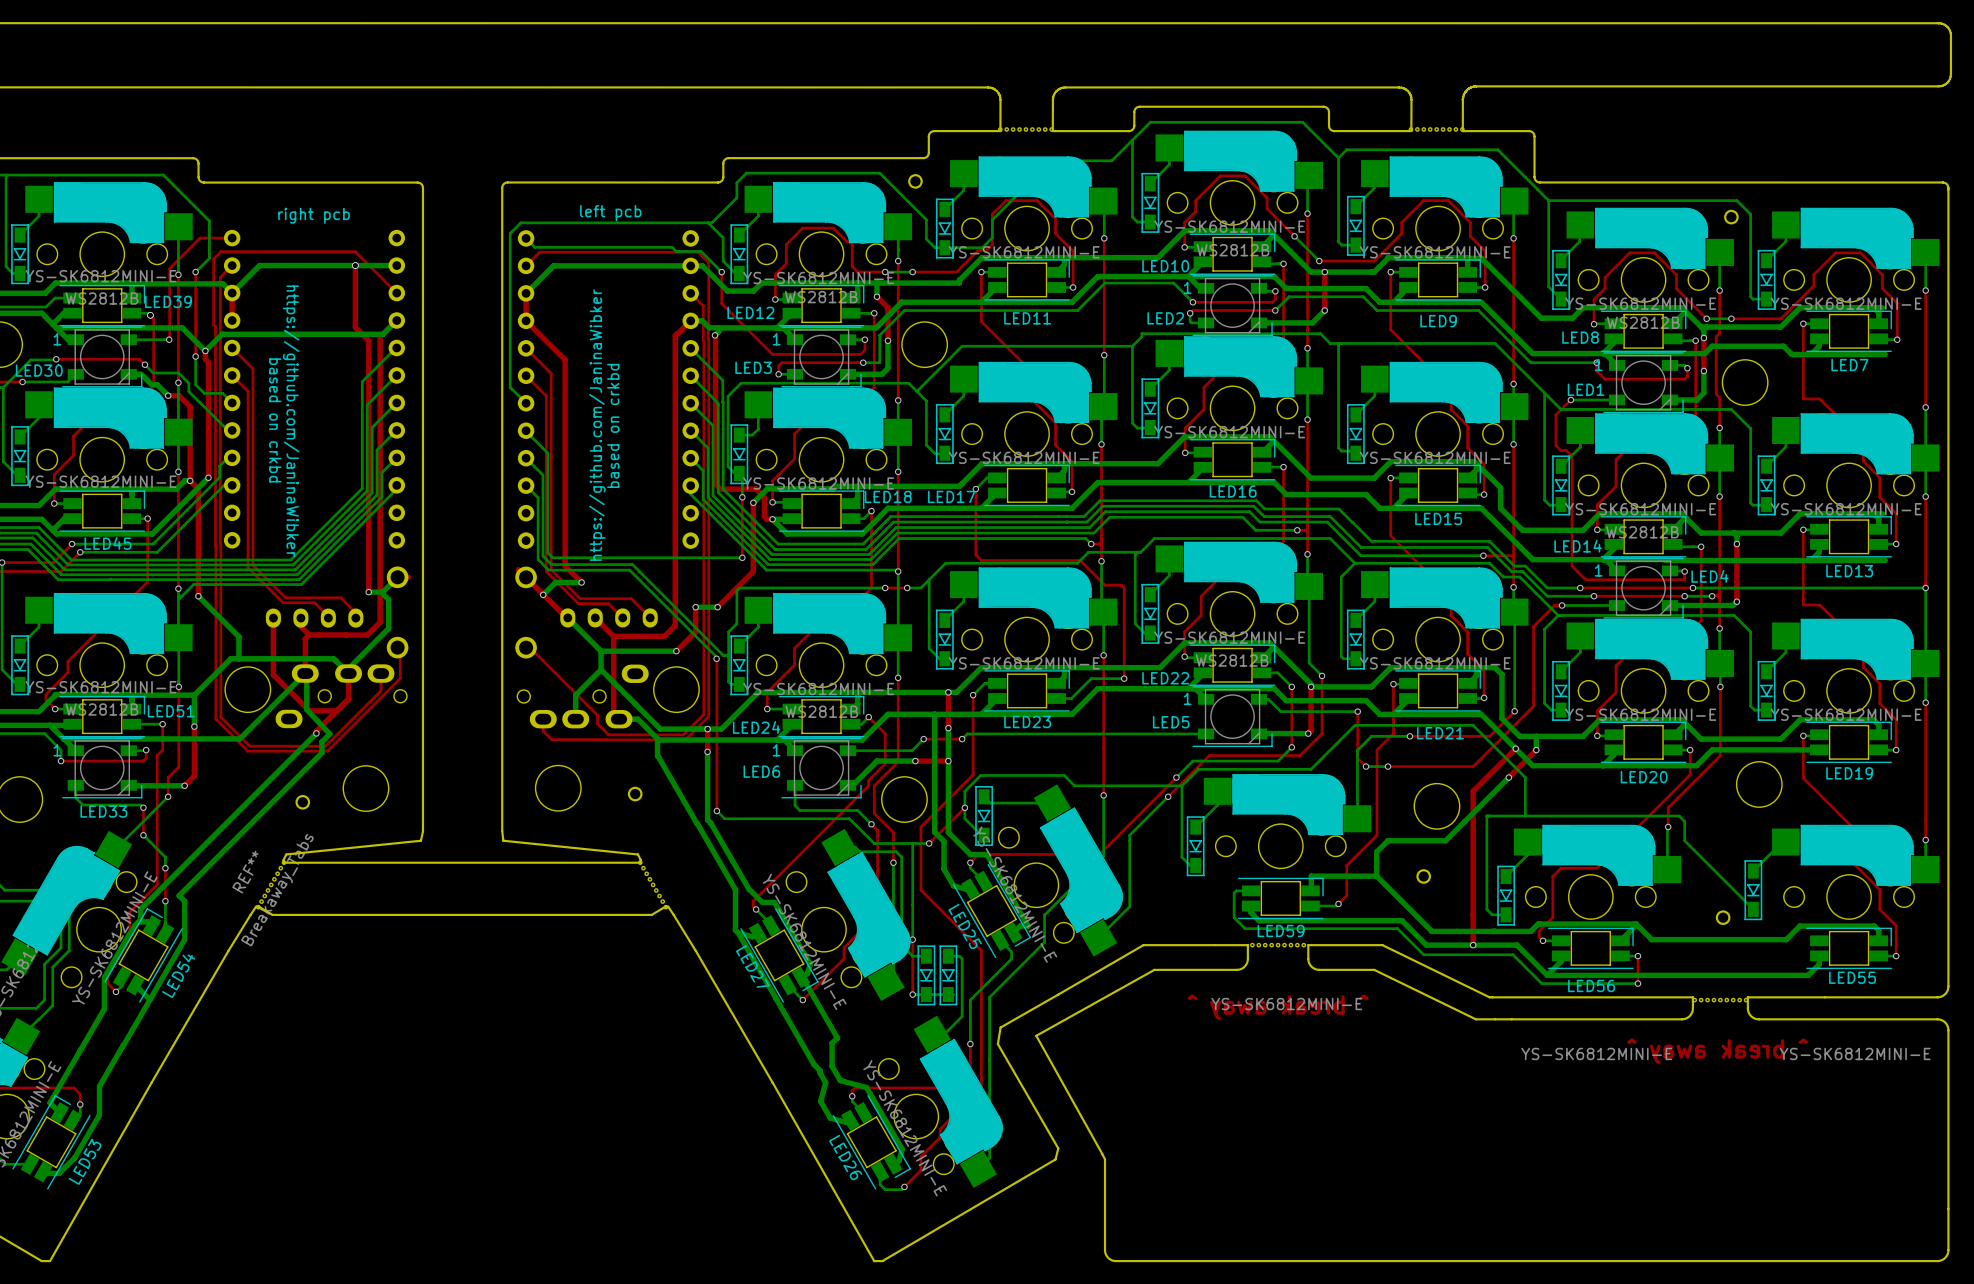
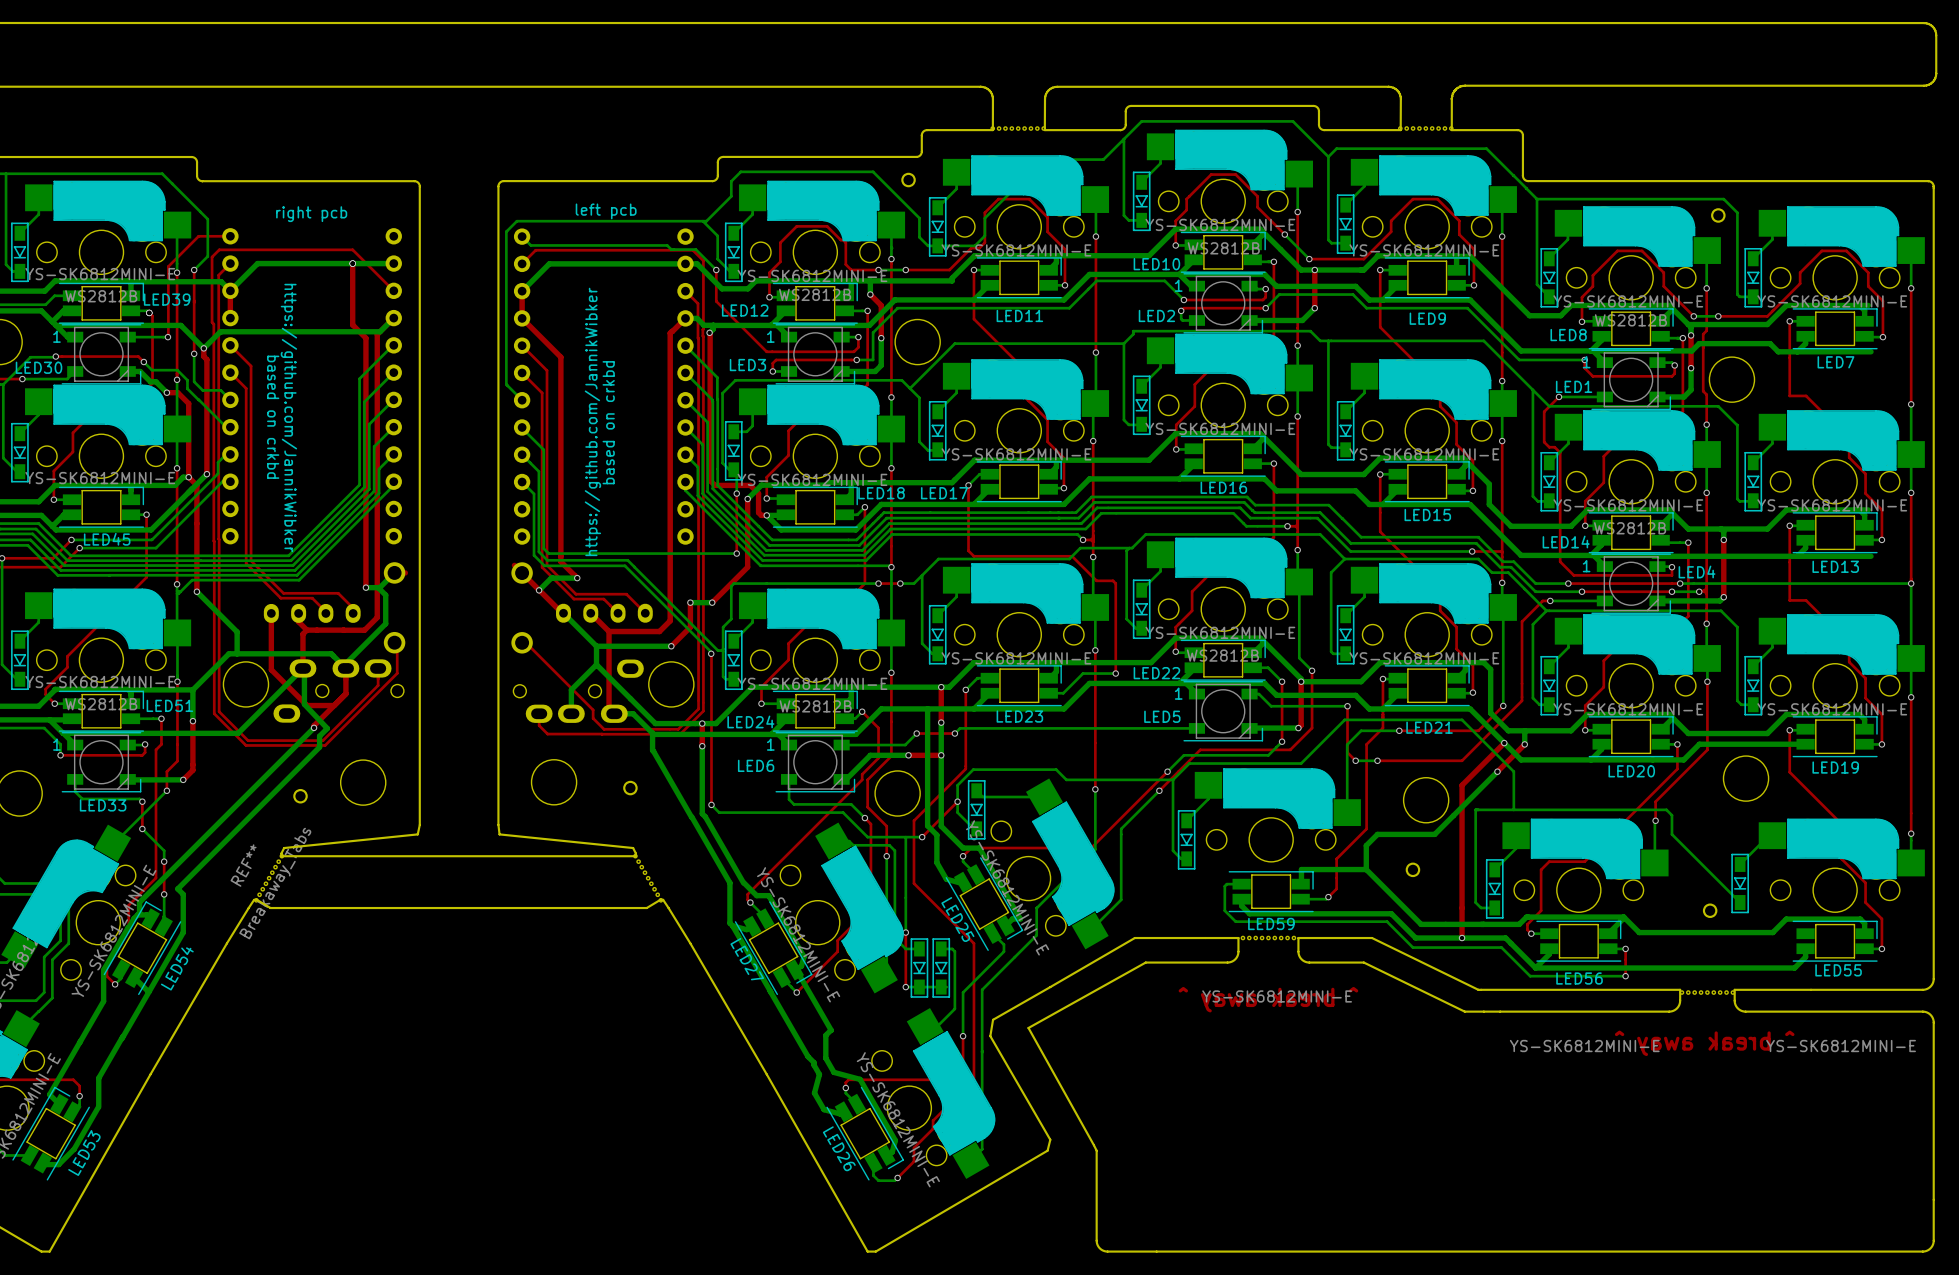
text: https://github.com/JaninaWibker (291, 421) -> https://github.com/JannikWibker (288, 418)
text: https://github.com/JaninaWibker (597, 425) -> https://github.com/JannikWibker (592, 421)

